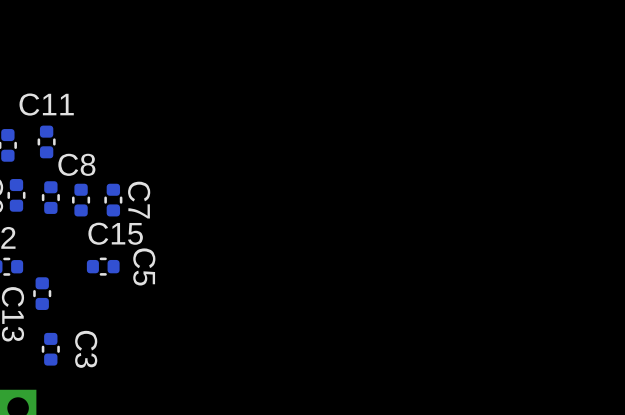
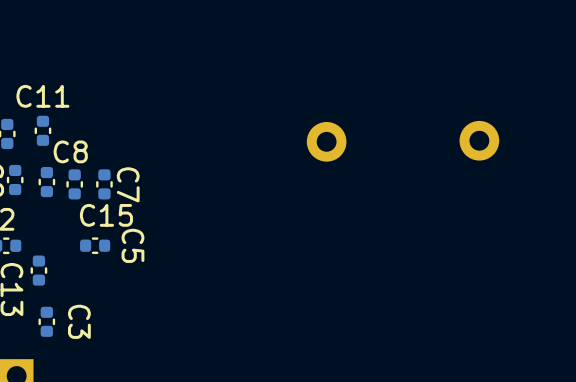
part: none -> (479, 140)
part: none -> (326, 141)

